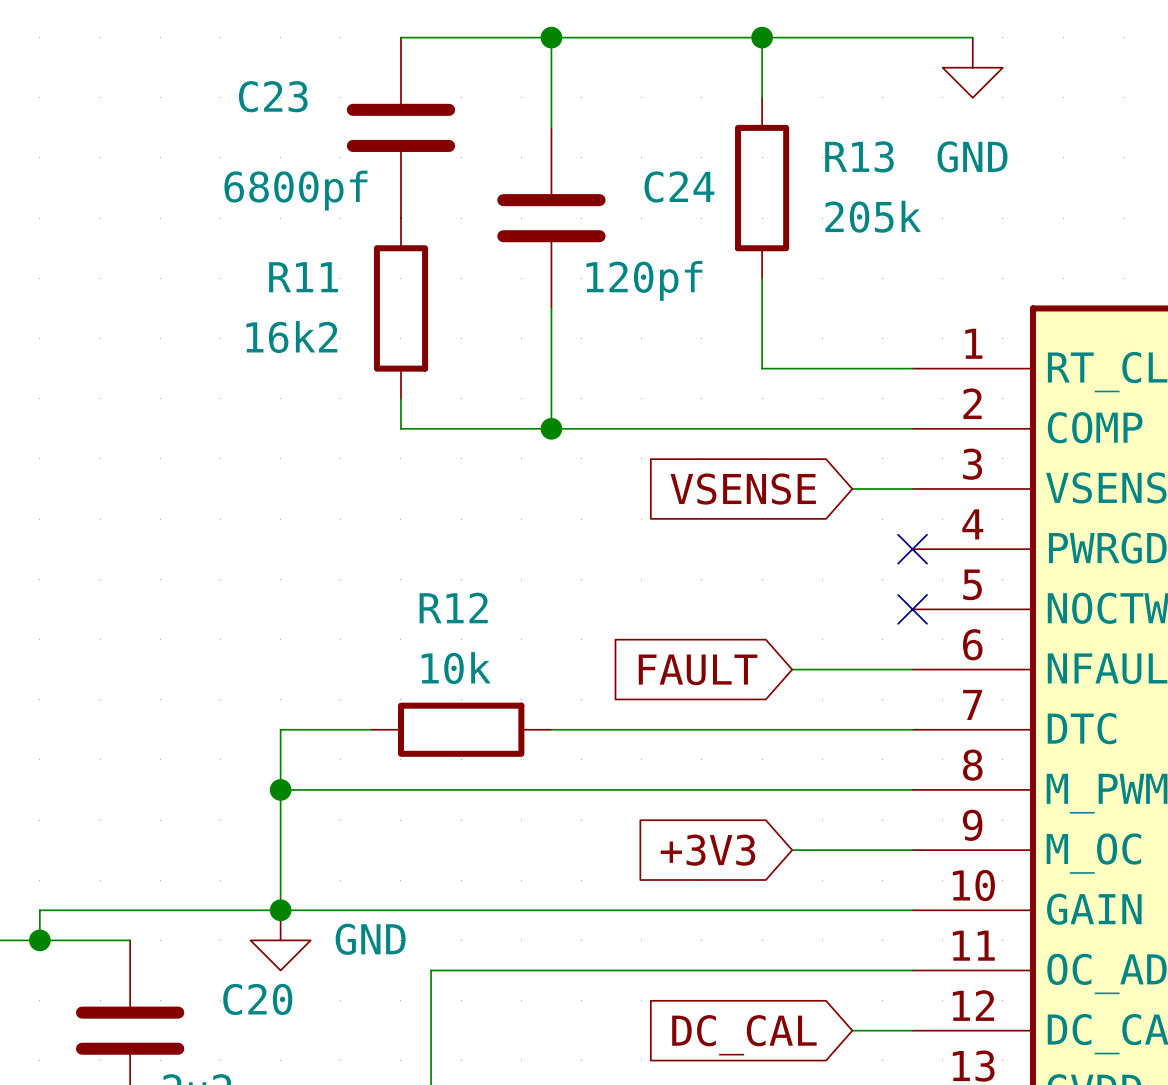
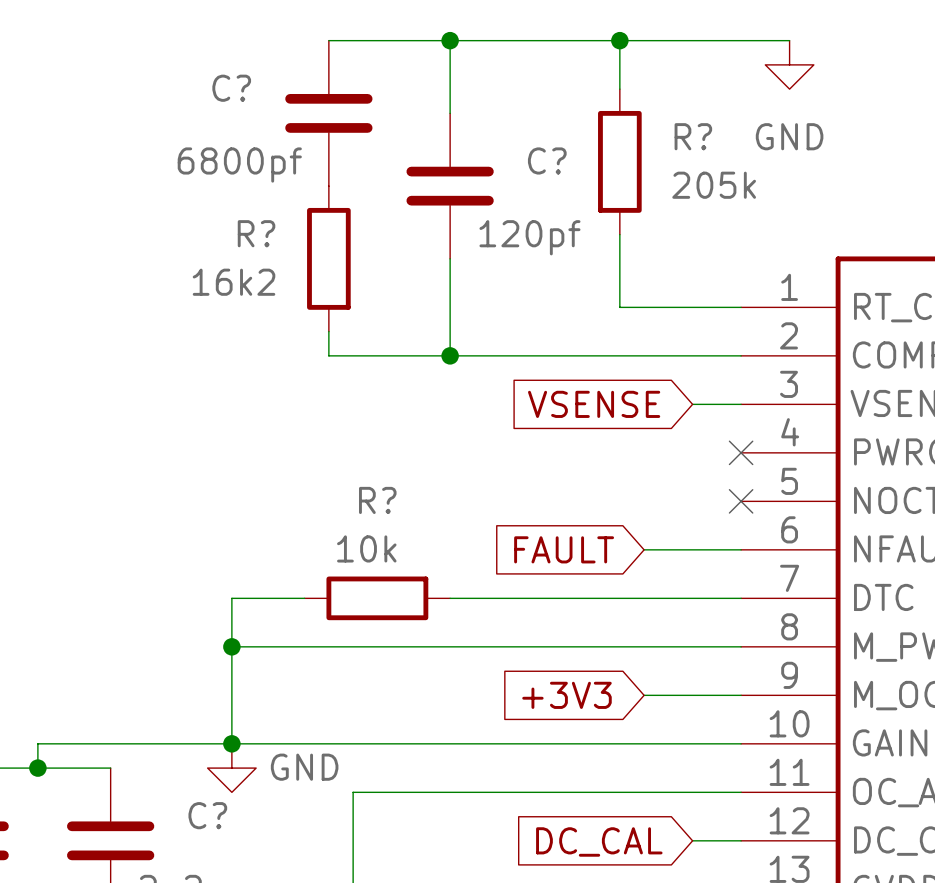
C23 name: C23 (273, 96) -> C? (231, 88)
R13 name: R13 (859, 156) -> R? (693, 136)
C24 name: C24 (679, 186) -> C? (547, 160)
R11 name: R11 (303, 277) -> R? (256, 233)
R12 name: R12 (453, 607) -> R? (377, 500)
C20 name: C20 (257, 999) -> C? (207, 815)

